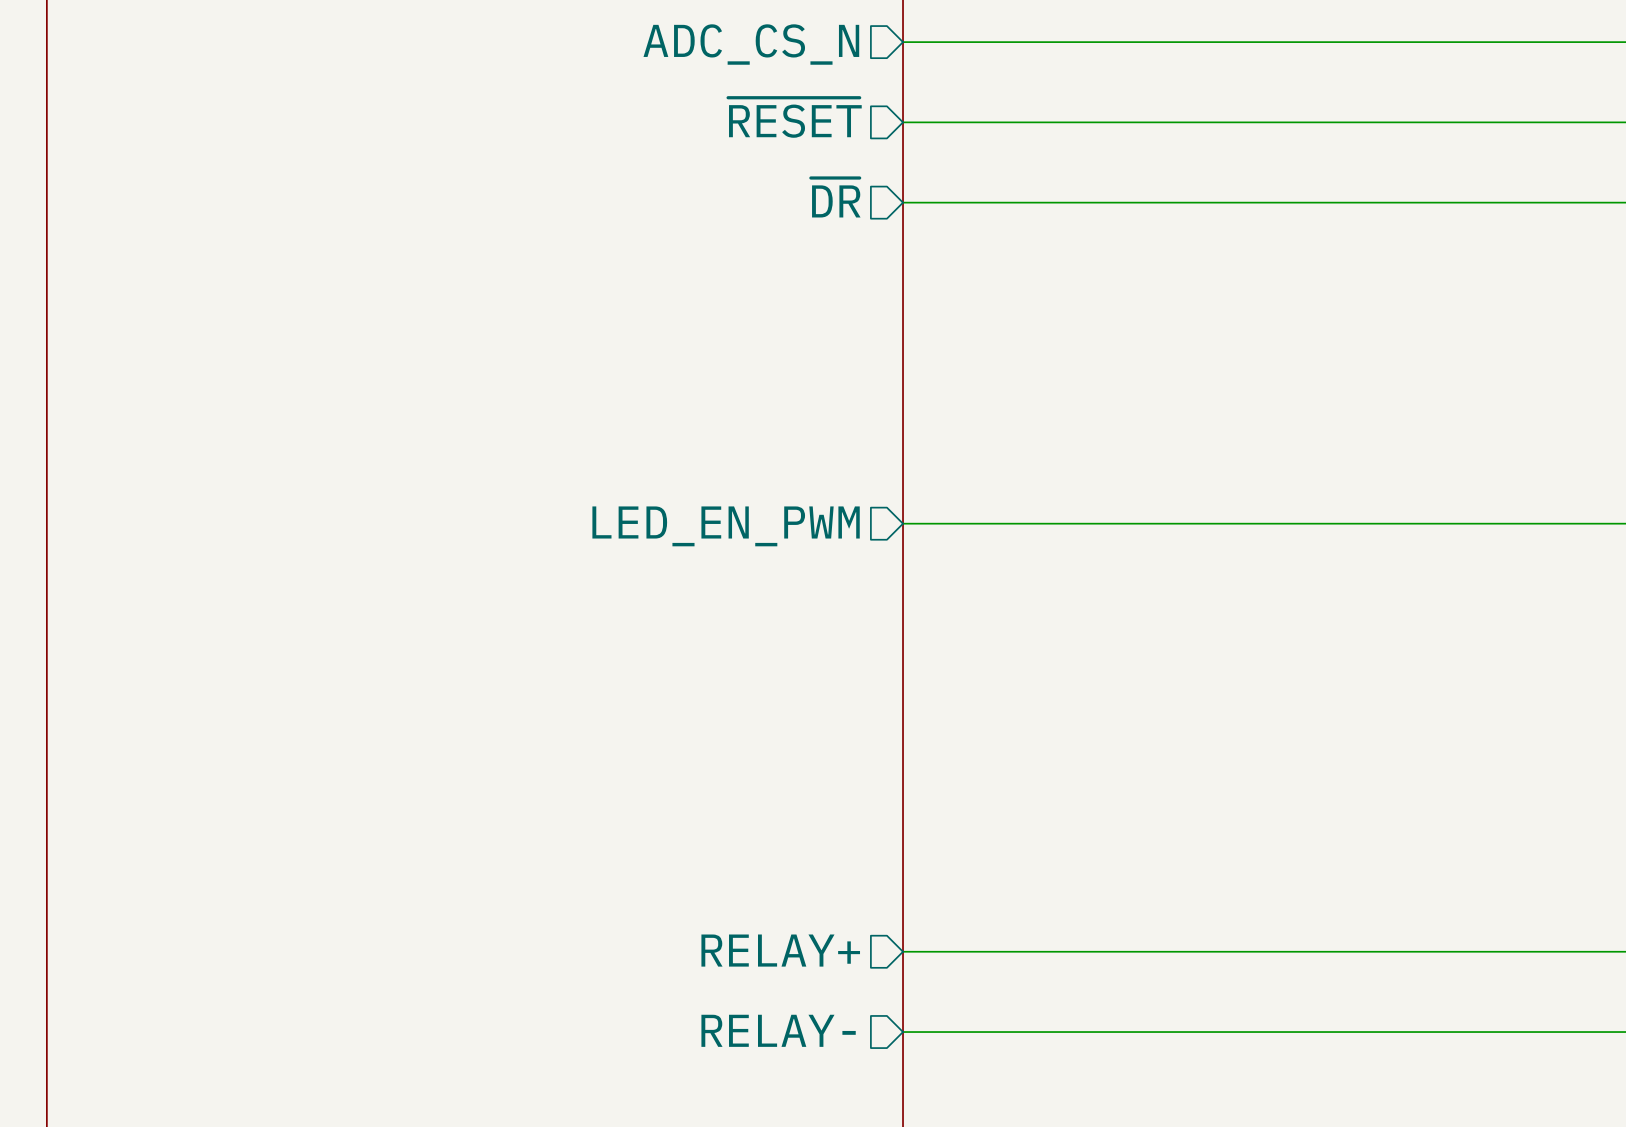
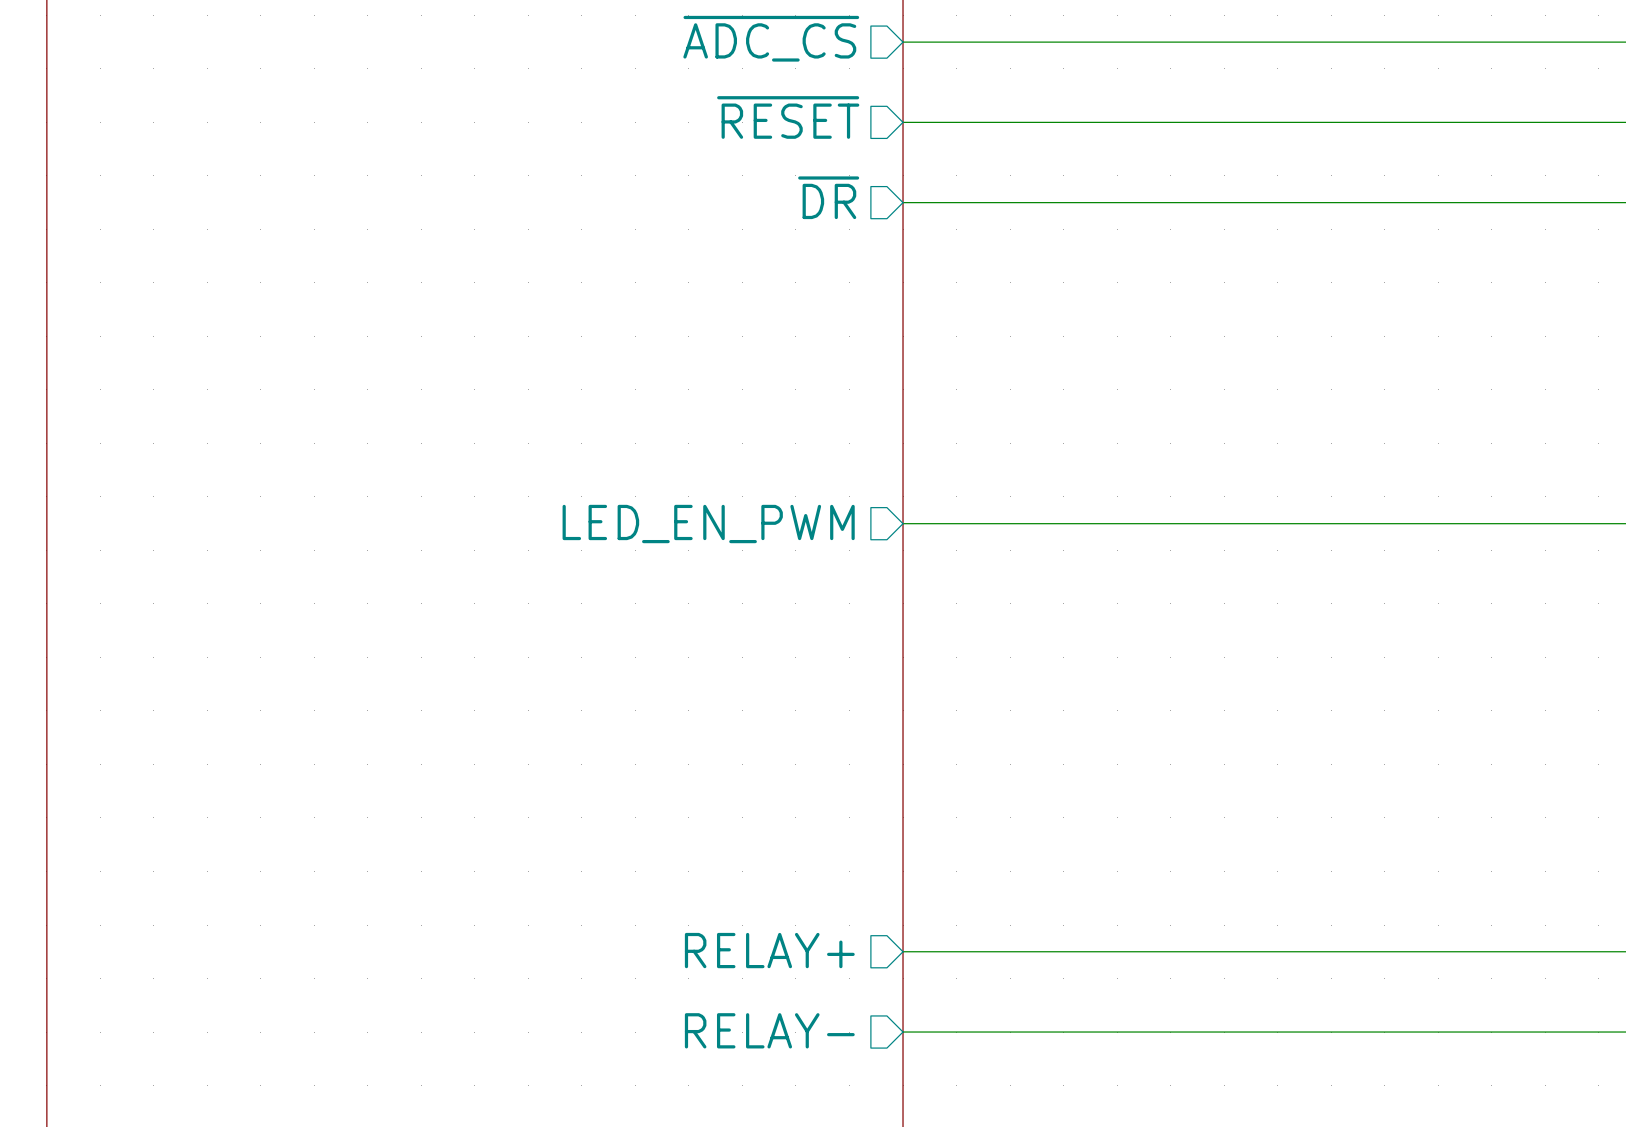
sheet pin: ADC_CS_N (751, 44) -> ~{ADC_CS} (771, 38)

